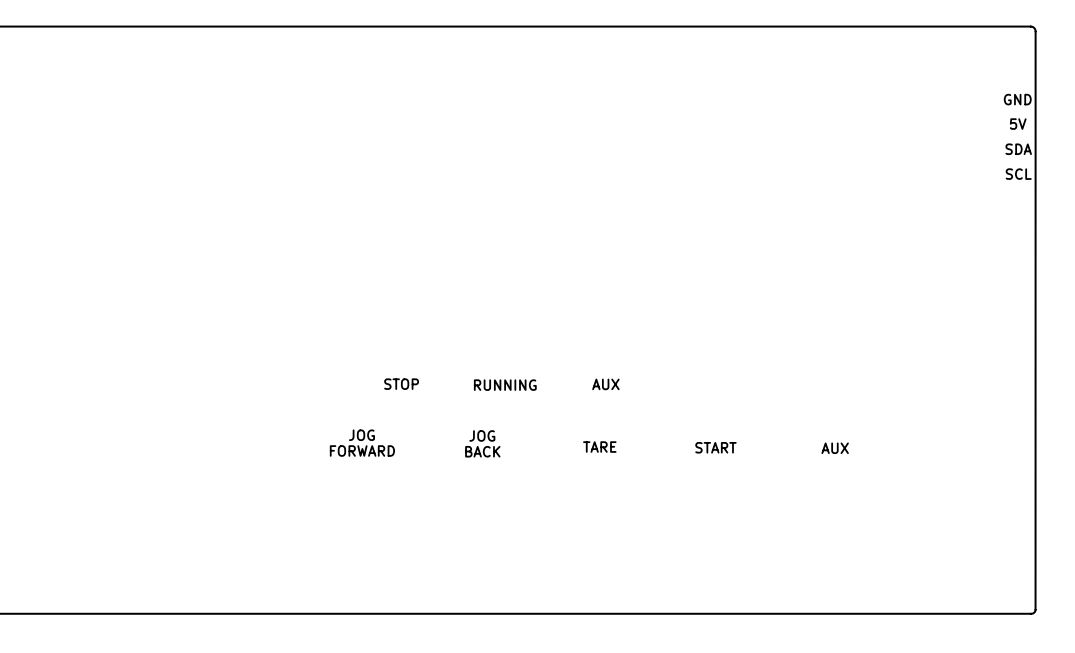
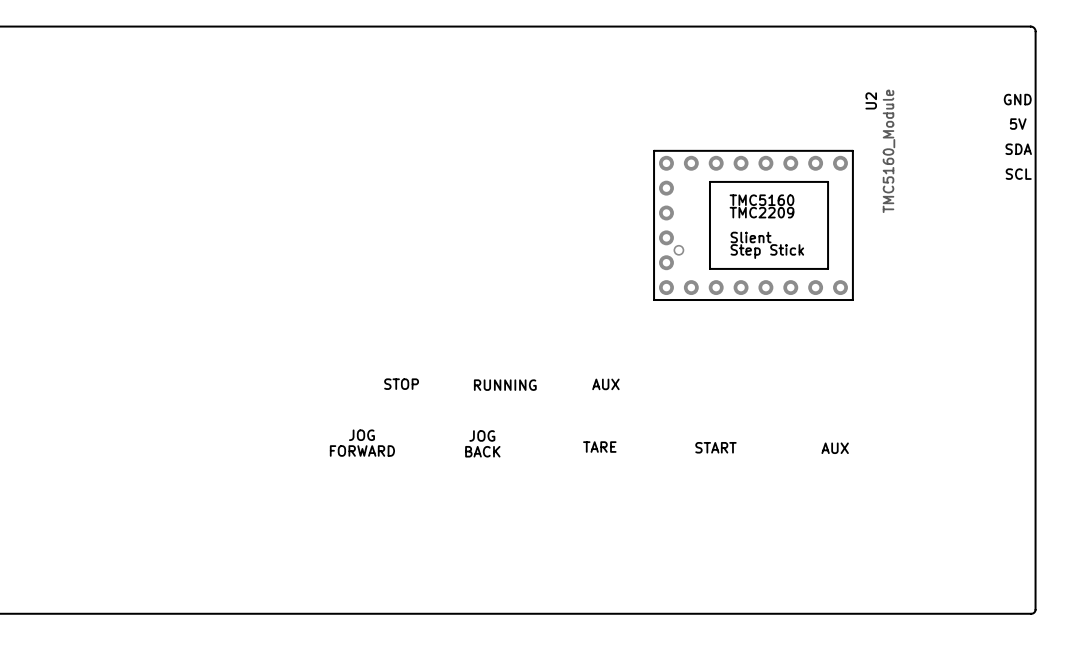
U2: none -> TMC5160_Module (753, 225)

